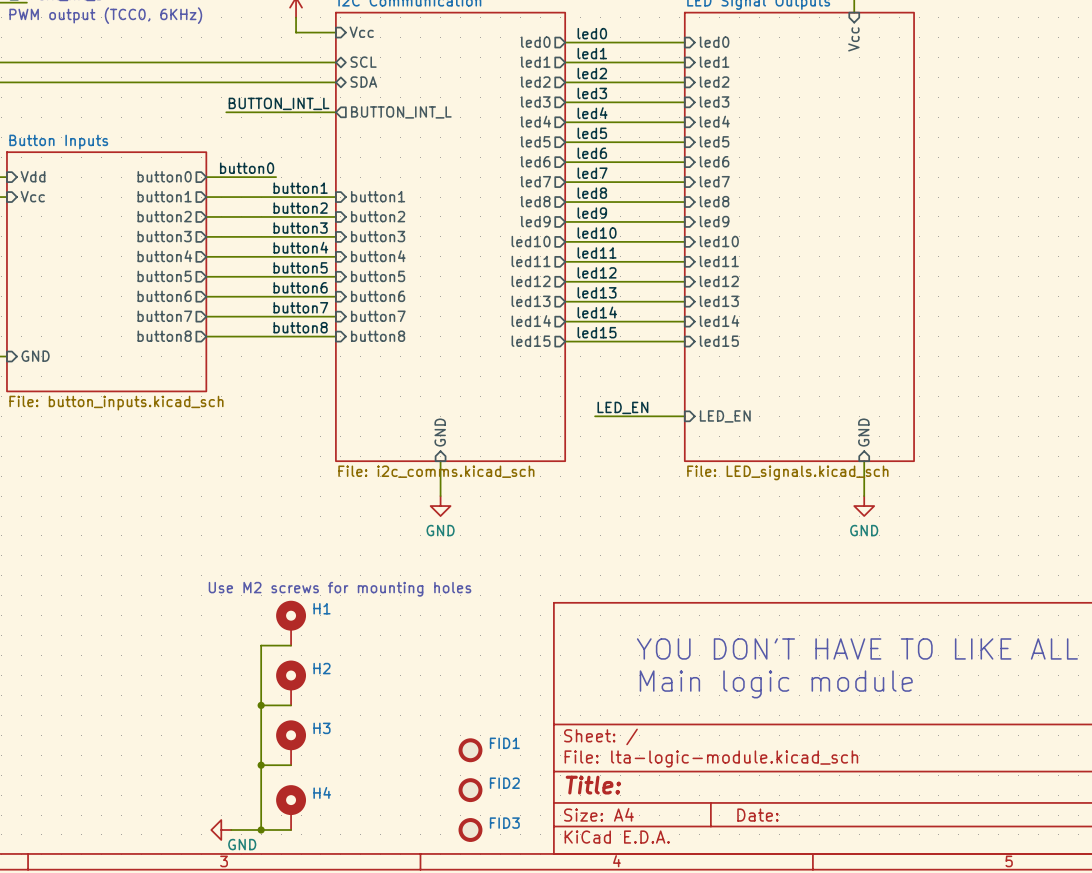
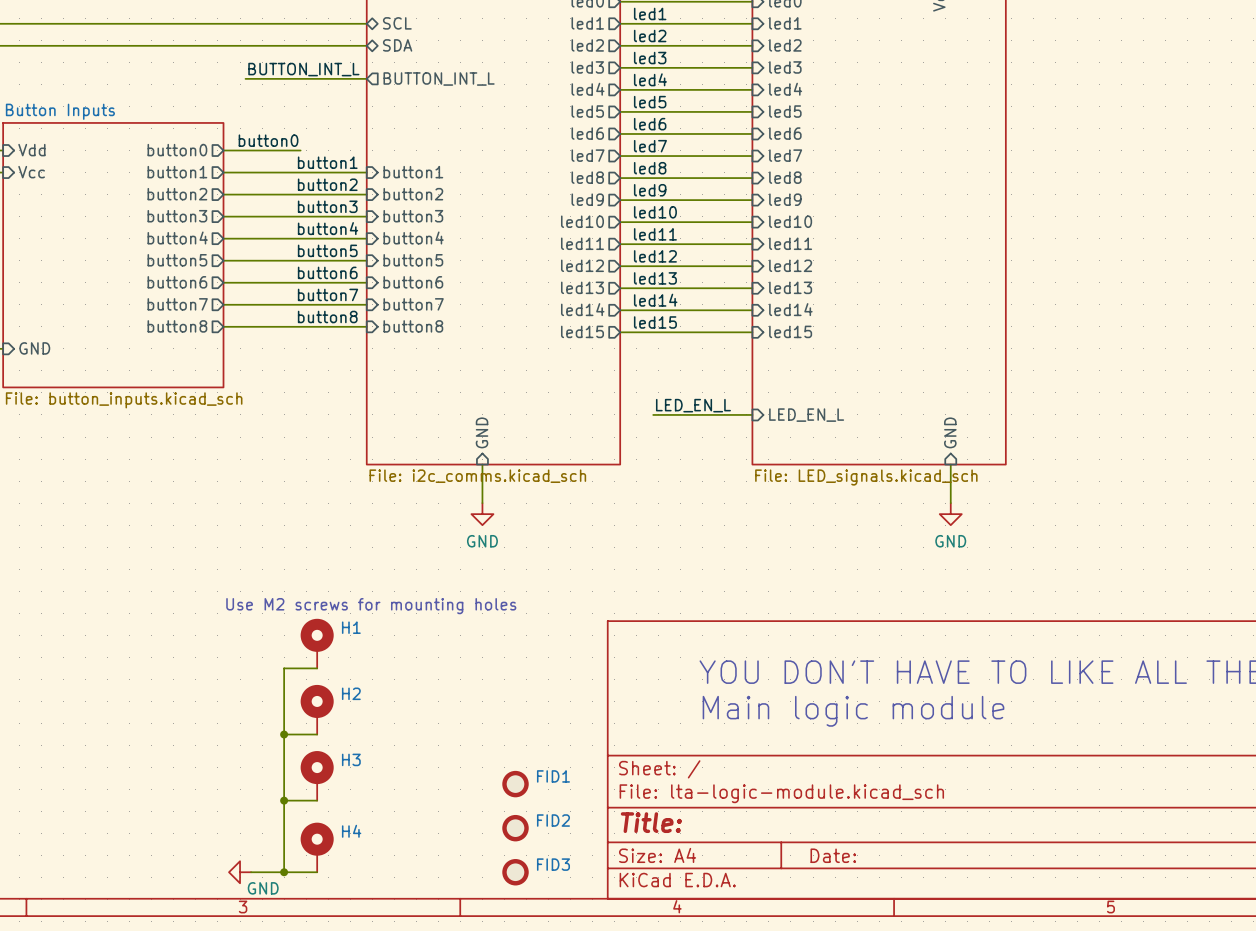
label: LED_EN (622, 407) -> LED_EN_L (693, 405)
sheet pin: LED_EN (725, 416) -> LED_EN_L (806, 415)

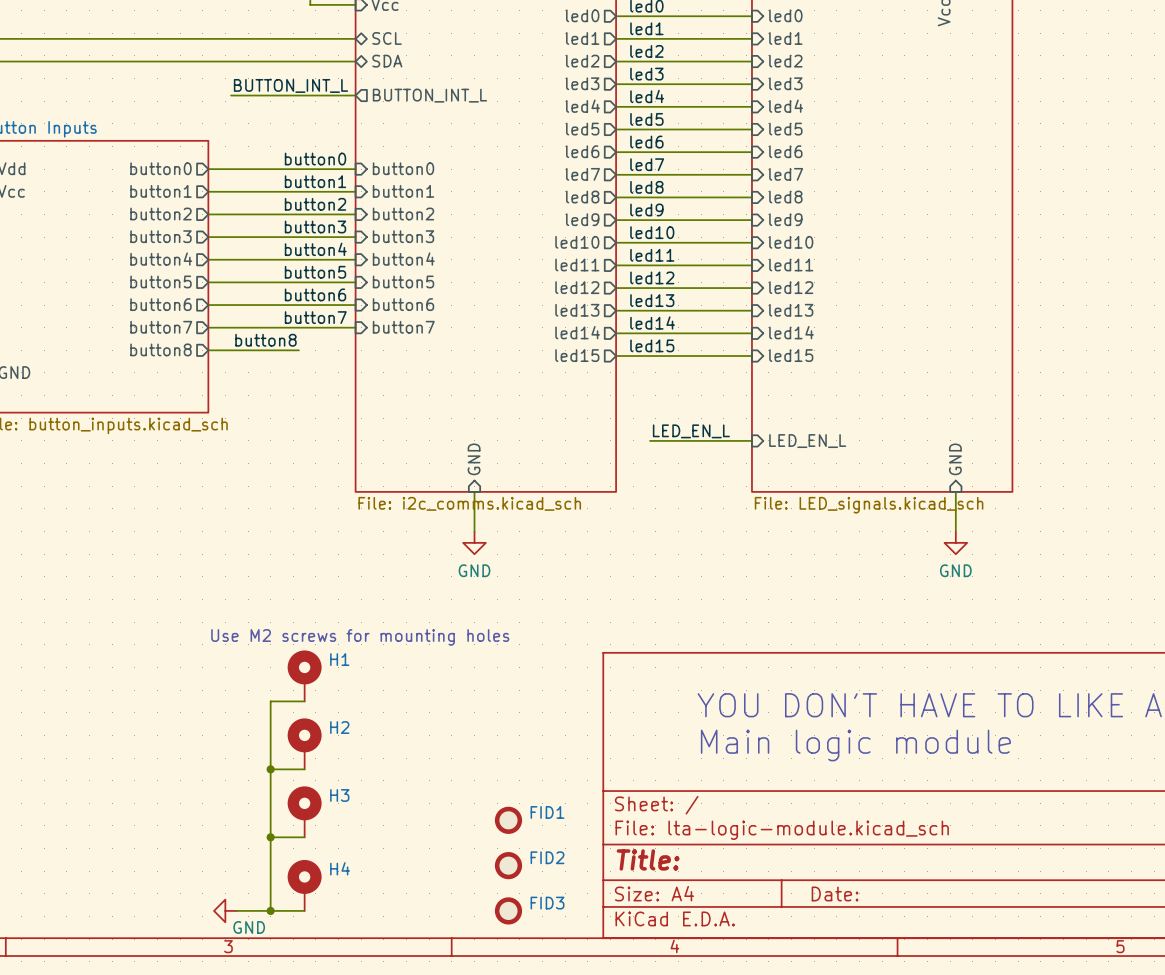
label position: button0 (268, 140) -> button0 (315, 159)
wire: none -> (287, 169) (355, 169)
sheet pin: none -> button0 (403, 168)
label position: button8 (327, 316) -> button8 (265, 340)
wire: (311, 326) (366, 326) -> none
sheet pin: button8 (413, 326) -> none

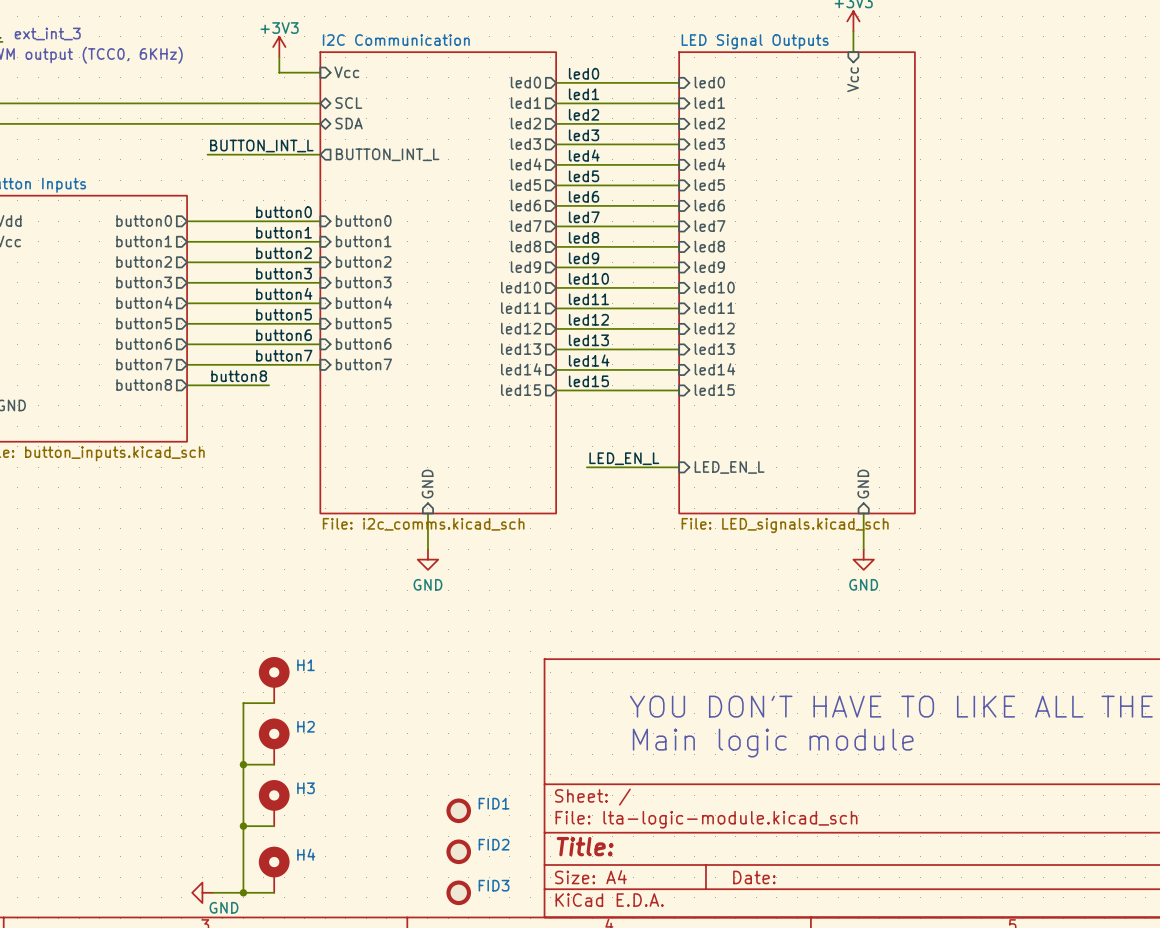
text: Use M2 screws for mounting holes (360, 637) -> none

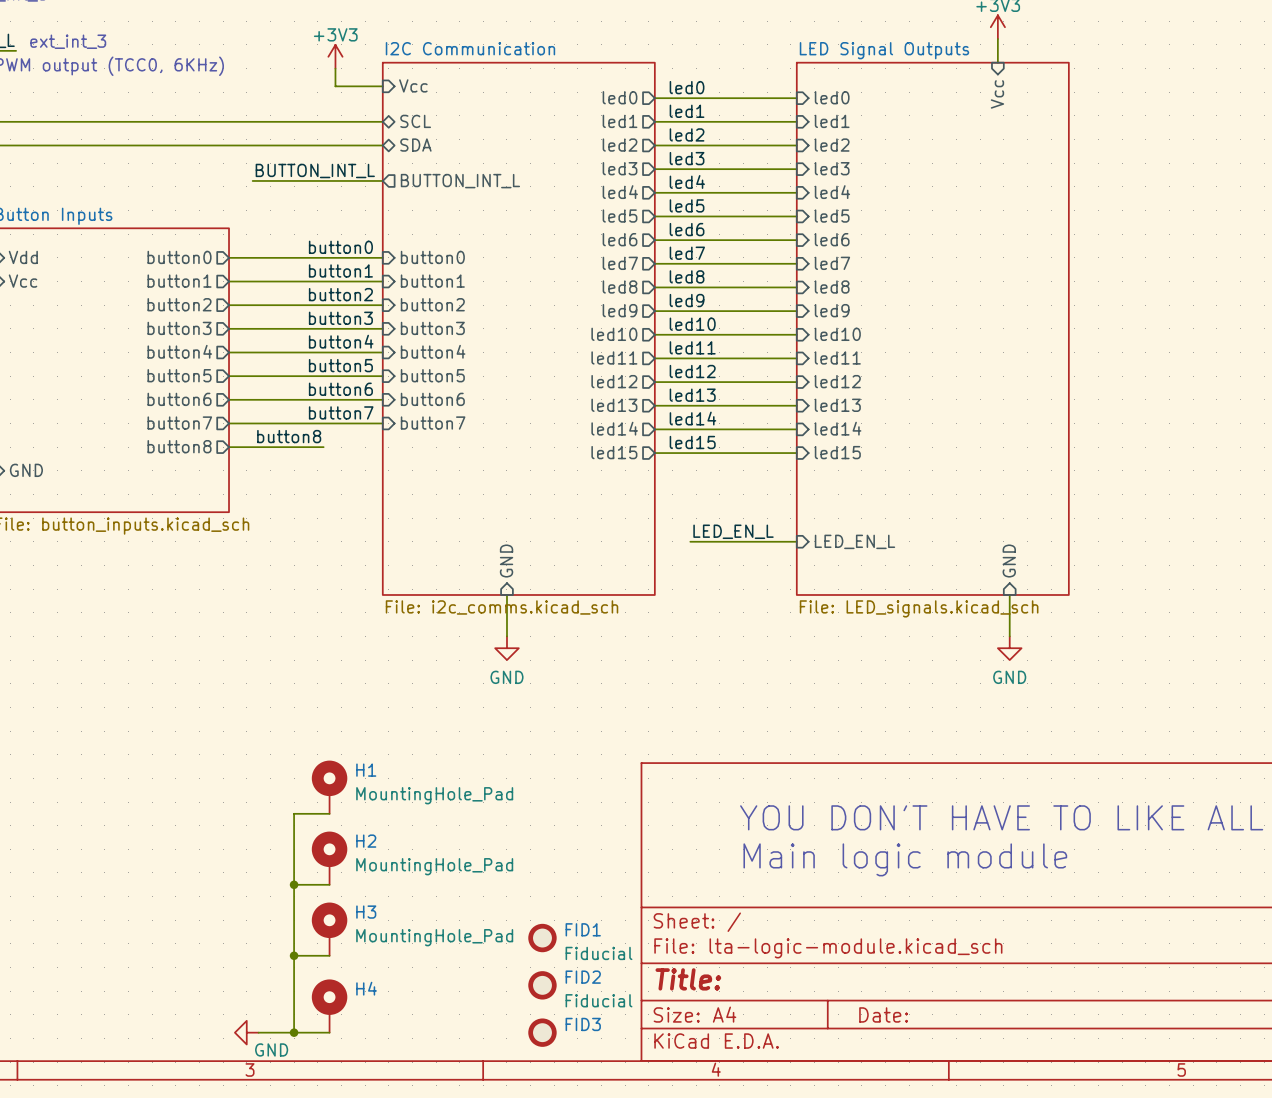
H1 value: none -> MountingHole_Pad (434, 795)
H2 value: none -> MountingHole_Pad (434, 866)
H3 value: none -> MountingHole_Pad (434, 937)
FID1 value: none -> Fiducial (599, 953)
FID2 value: none -> Fiducial (599, 1000)

